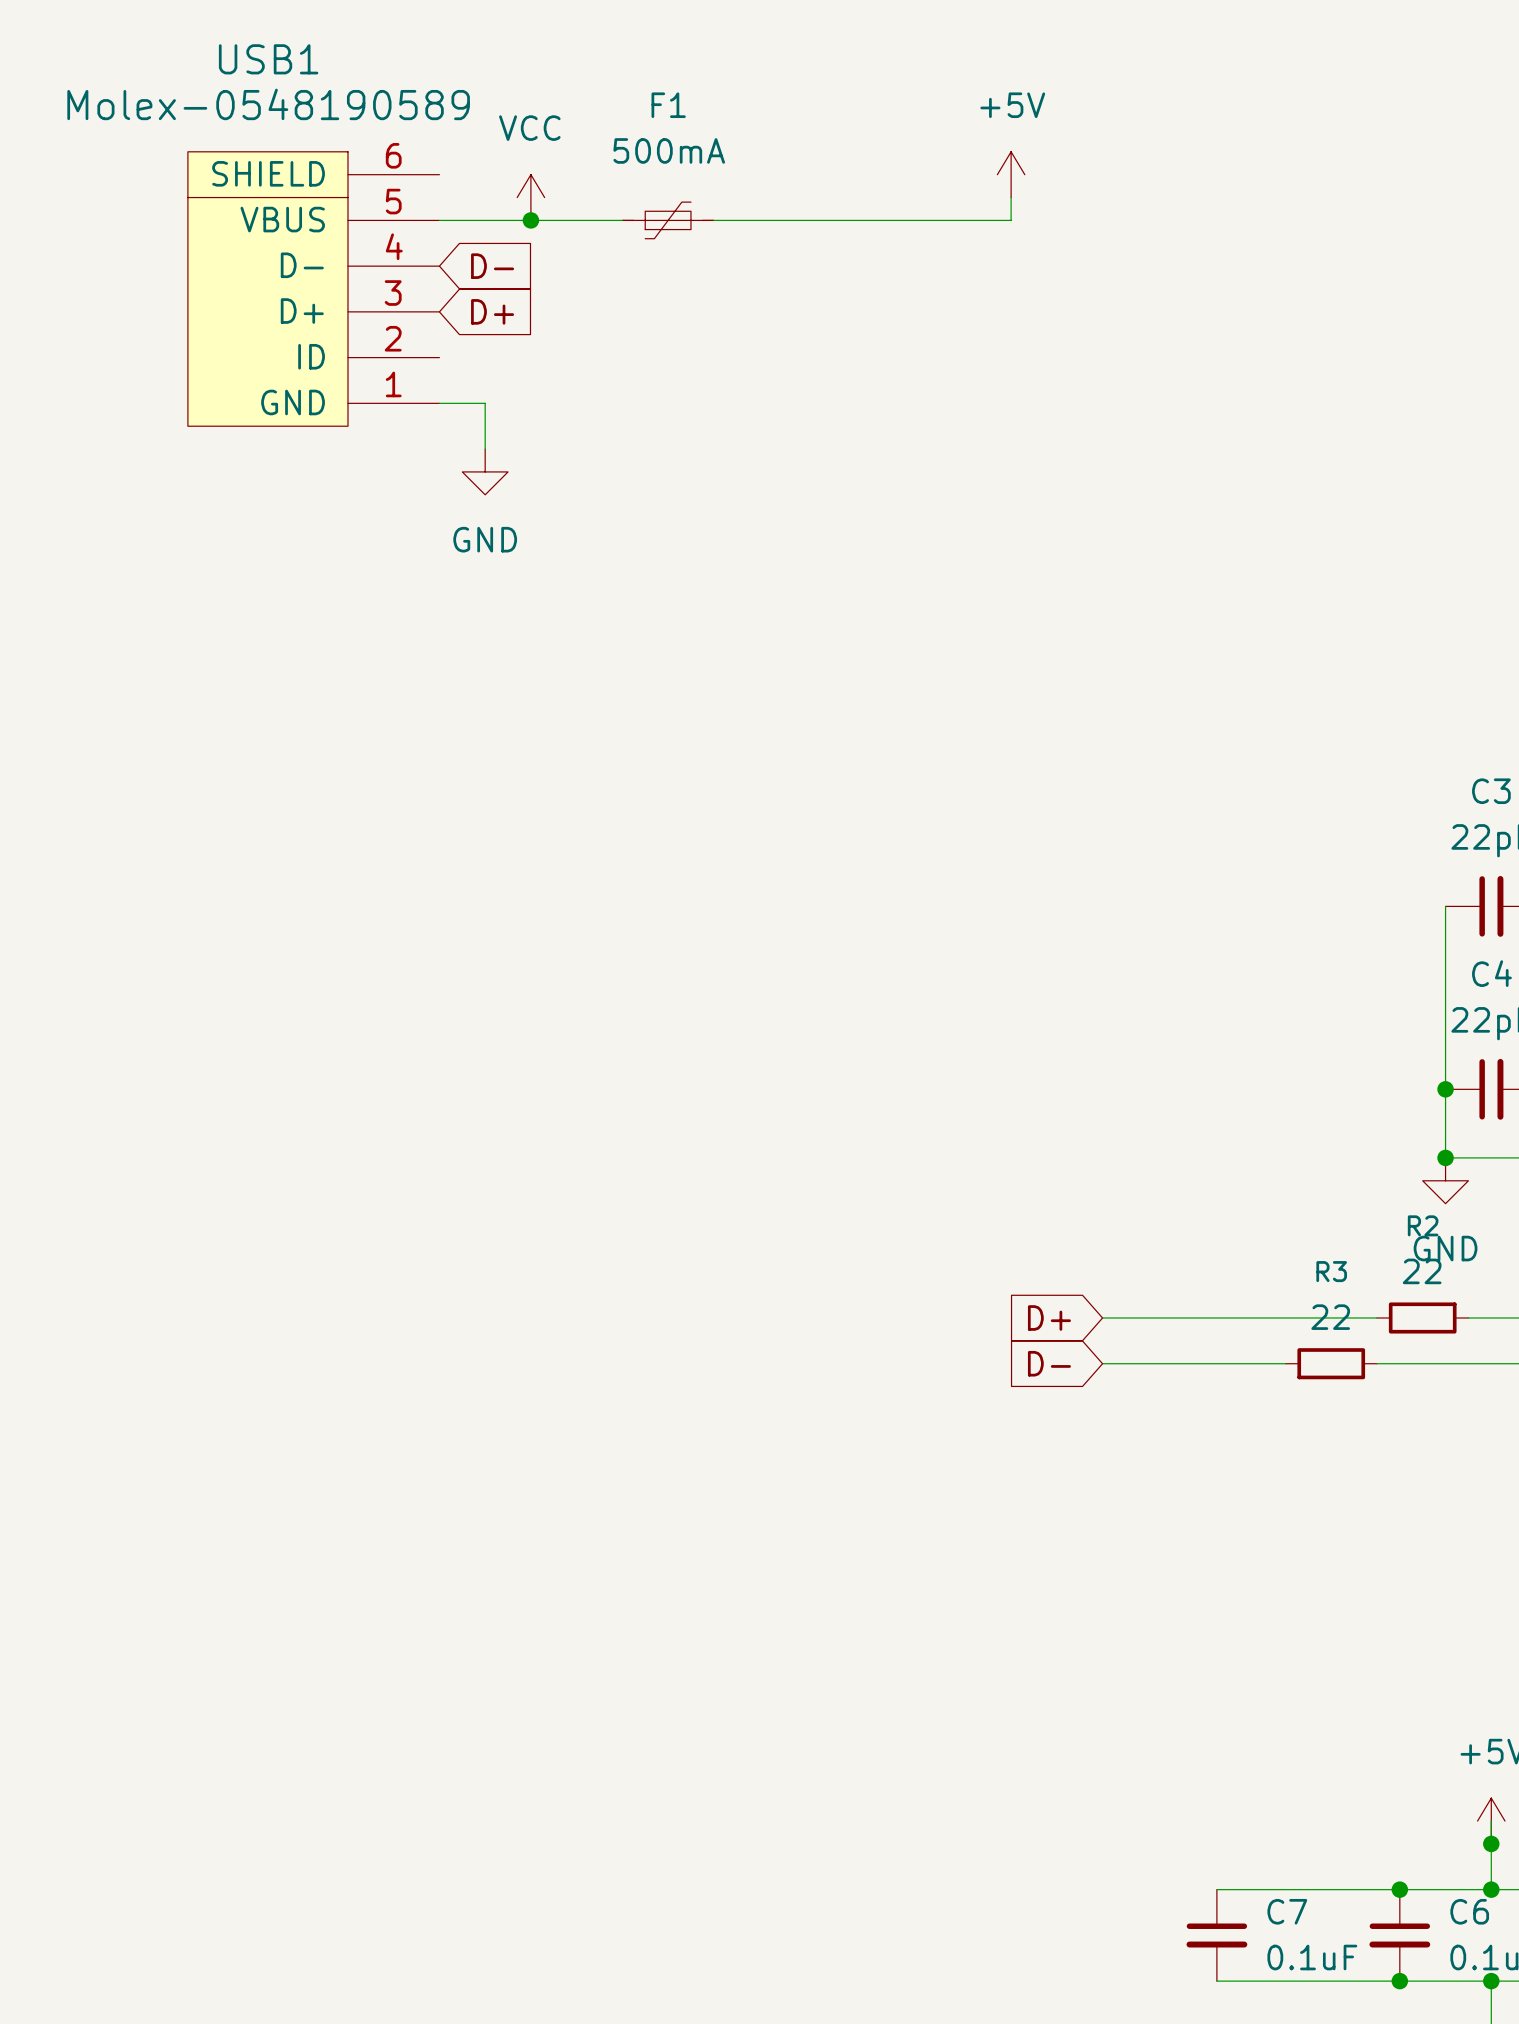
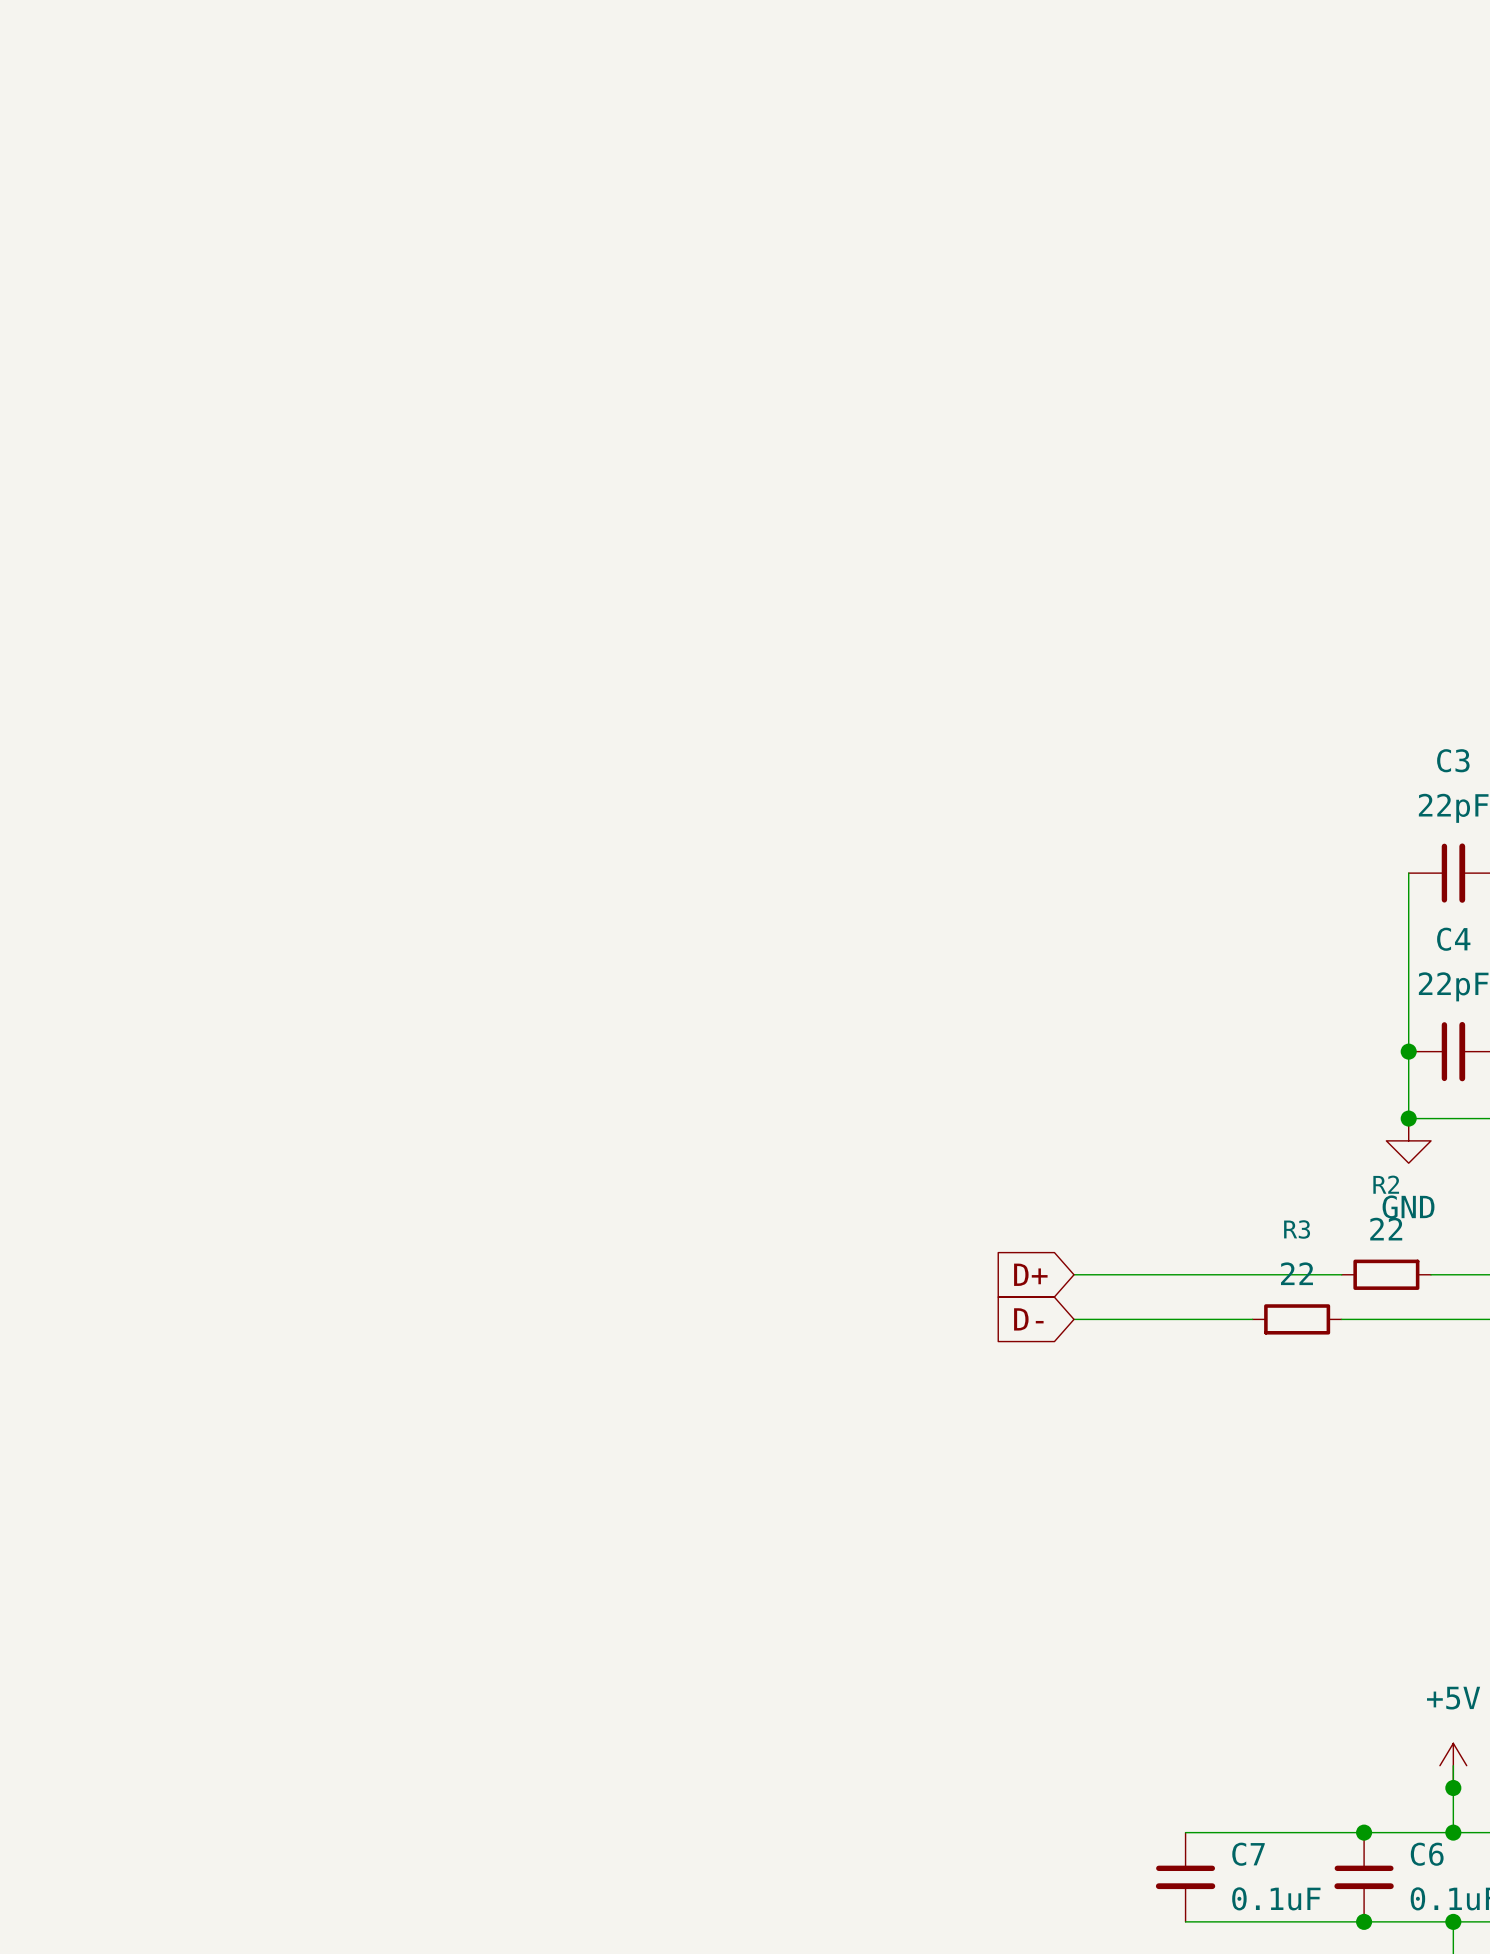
power symbol: +5V (1011, 174) -> none
power symbol: VCC (530, 197) -> none
wire: (1011, 197) (1011, 220) (713, 220) -> none
wire: (439, 220) (622, 220) -> none
junction: (530, 220) -> none
F1: 500mA (668, 220) -> none
global label: D- (492, 266) -> none
USB1: Molex-0548190589 (313, 289) -> none
global label: D+ (492, 311) -> none
wire: (439, 403) (485, 403) (485, 449) -> none
power symbol: GND (485, 471) -> none

